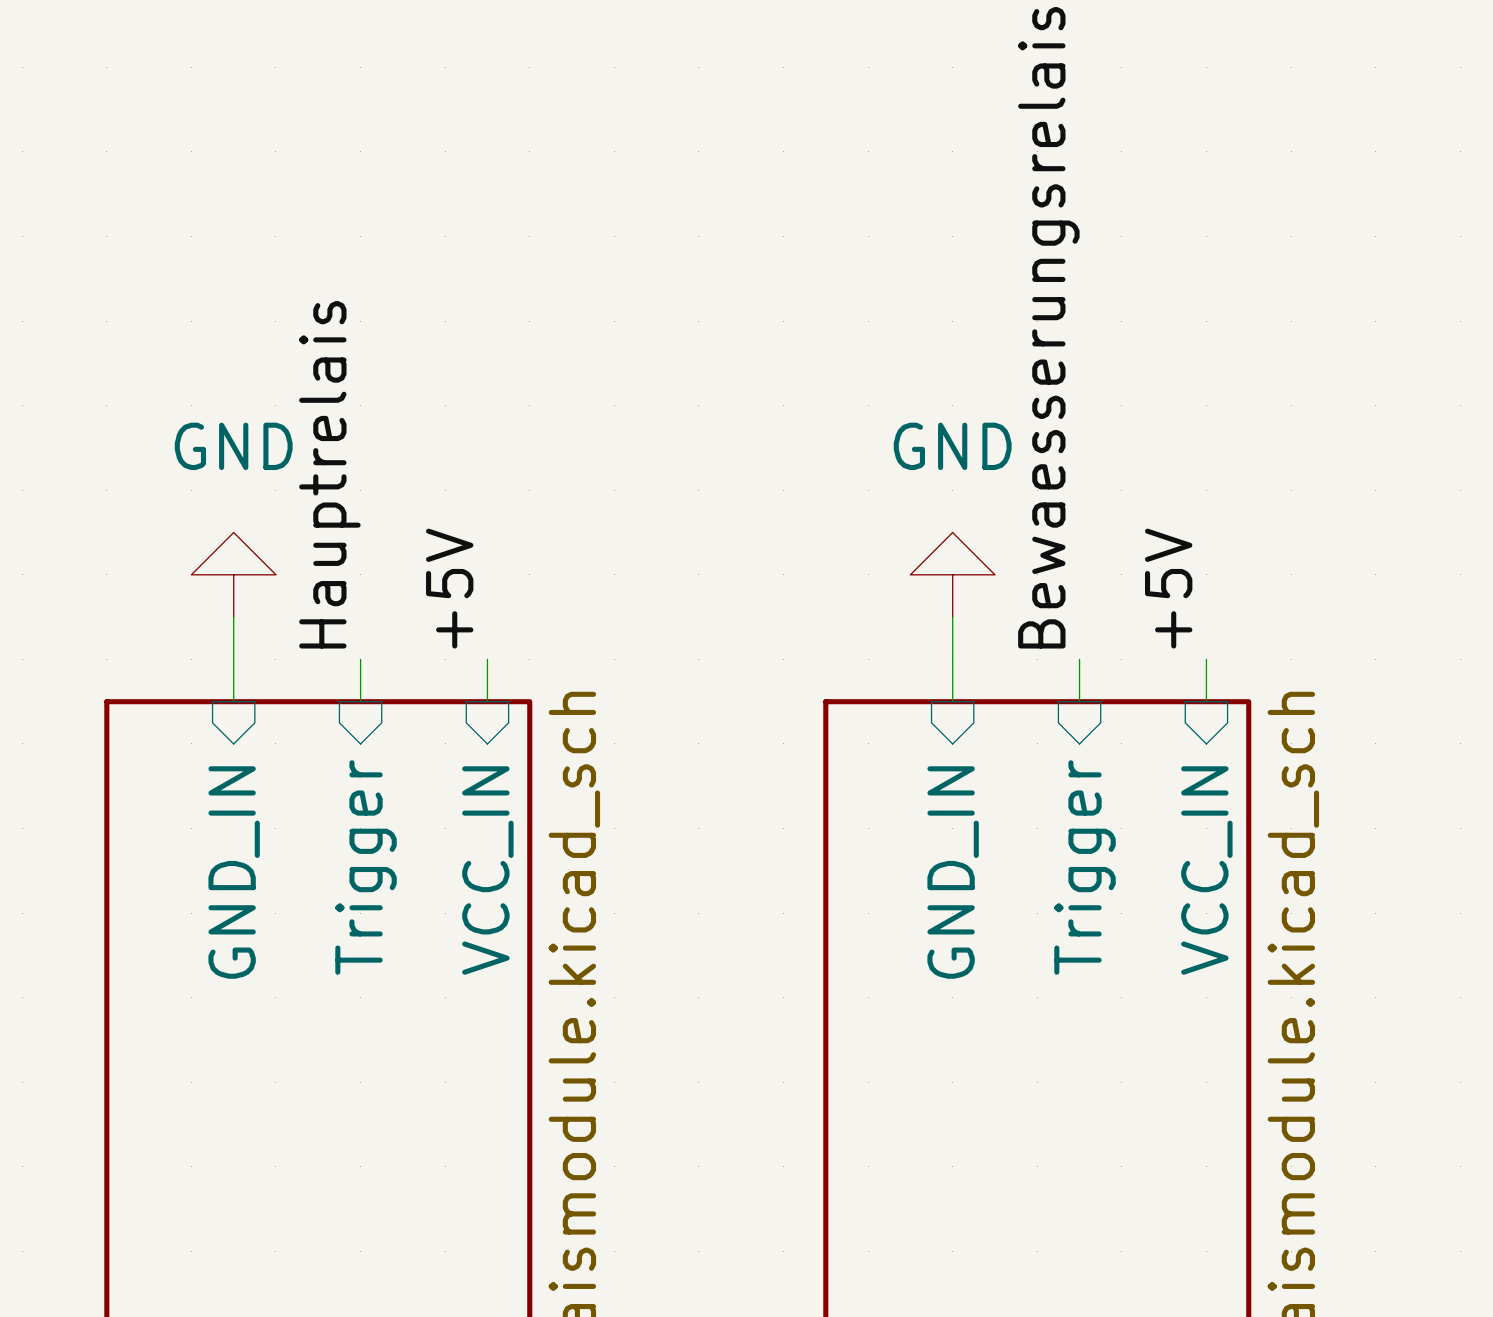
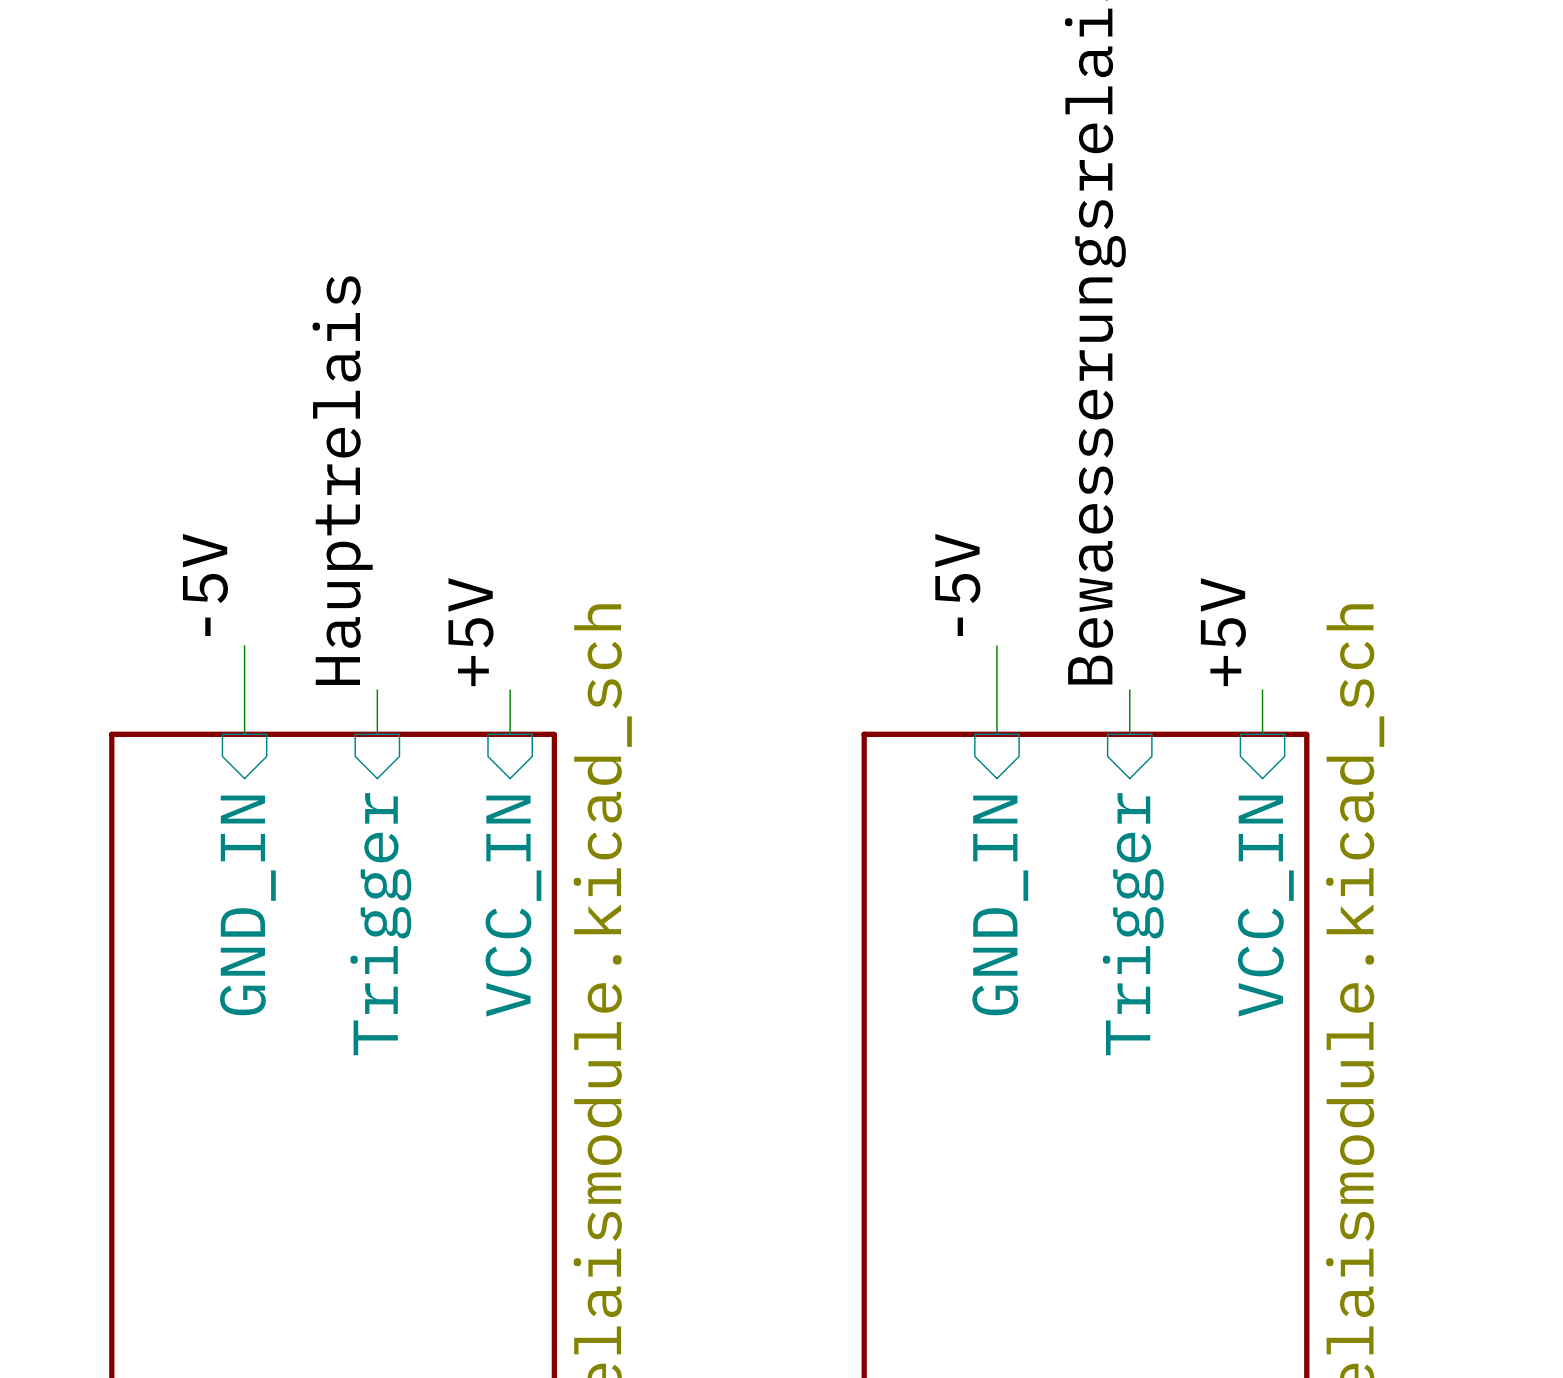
label: none -> -5V (205, 584)
label: none -> -5V (957, 584)
power symbol: GND (233, 574) -> none
power symbol: GND (952, 574) -> none

